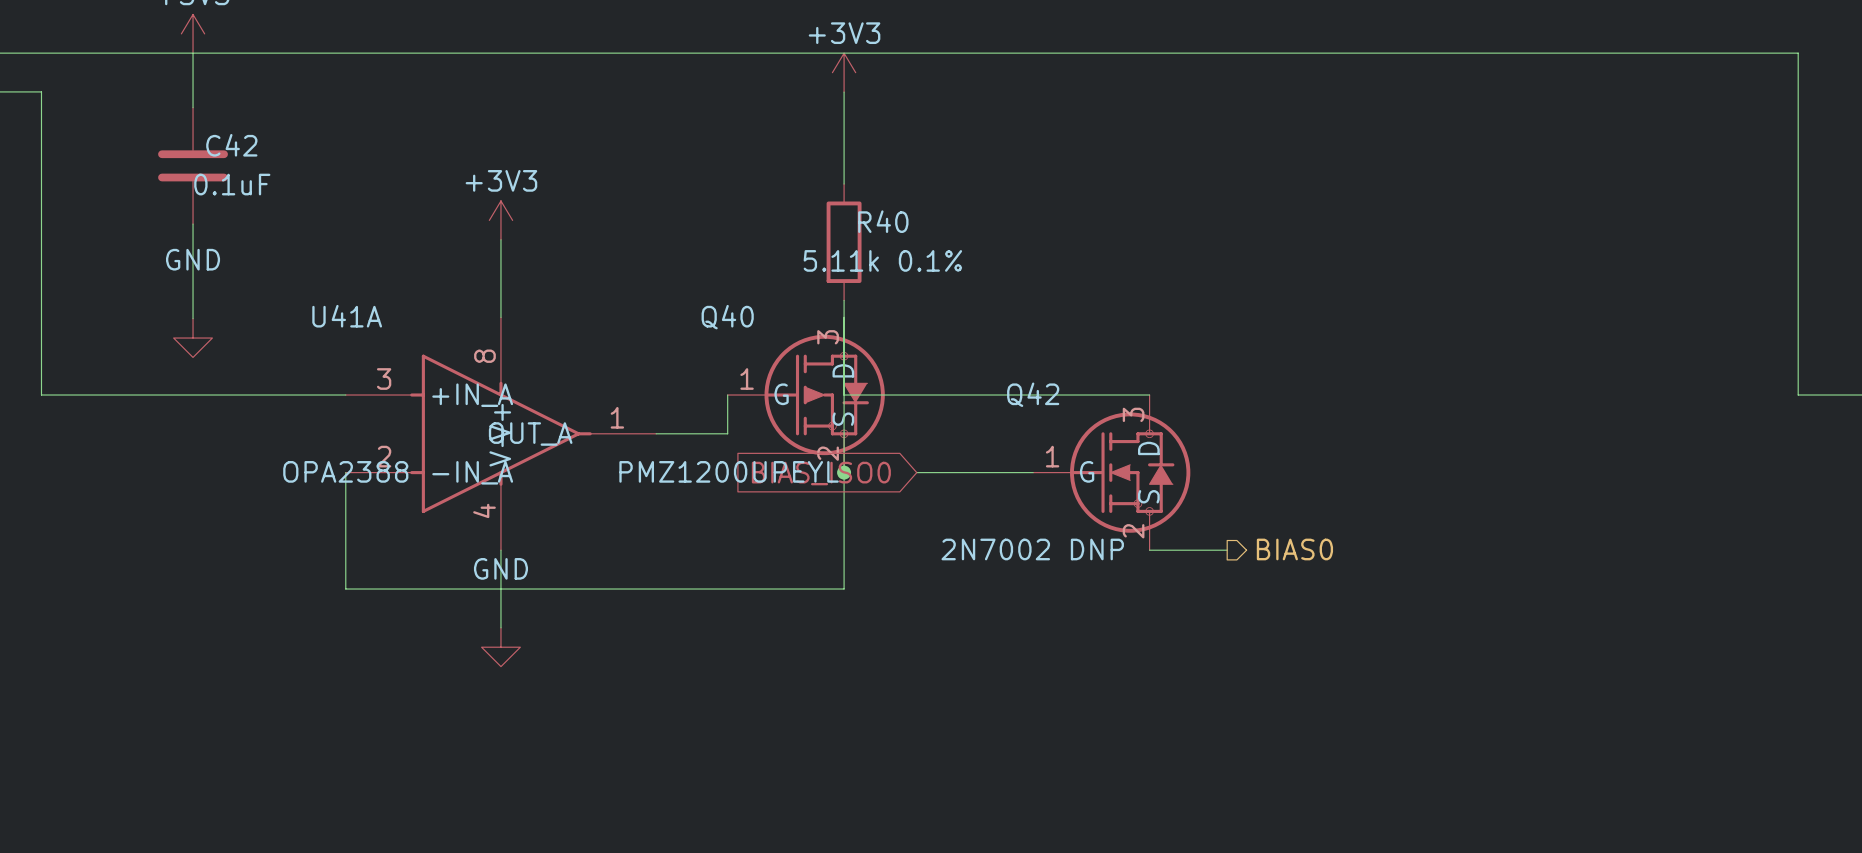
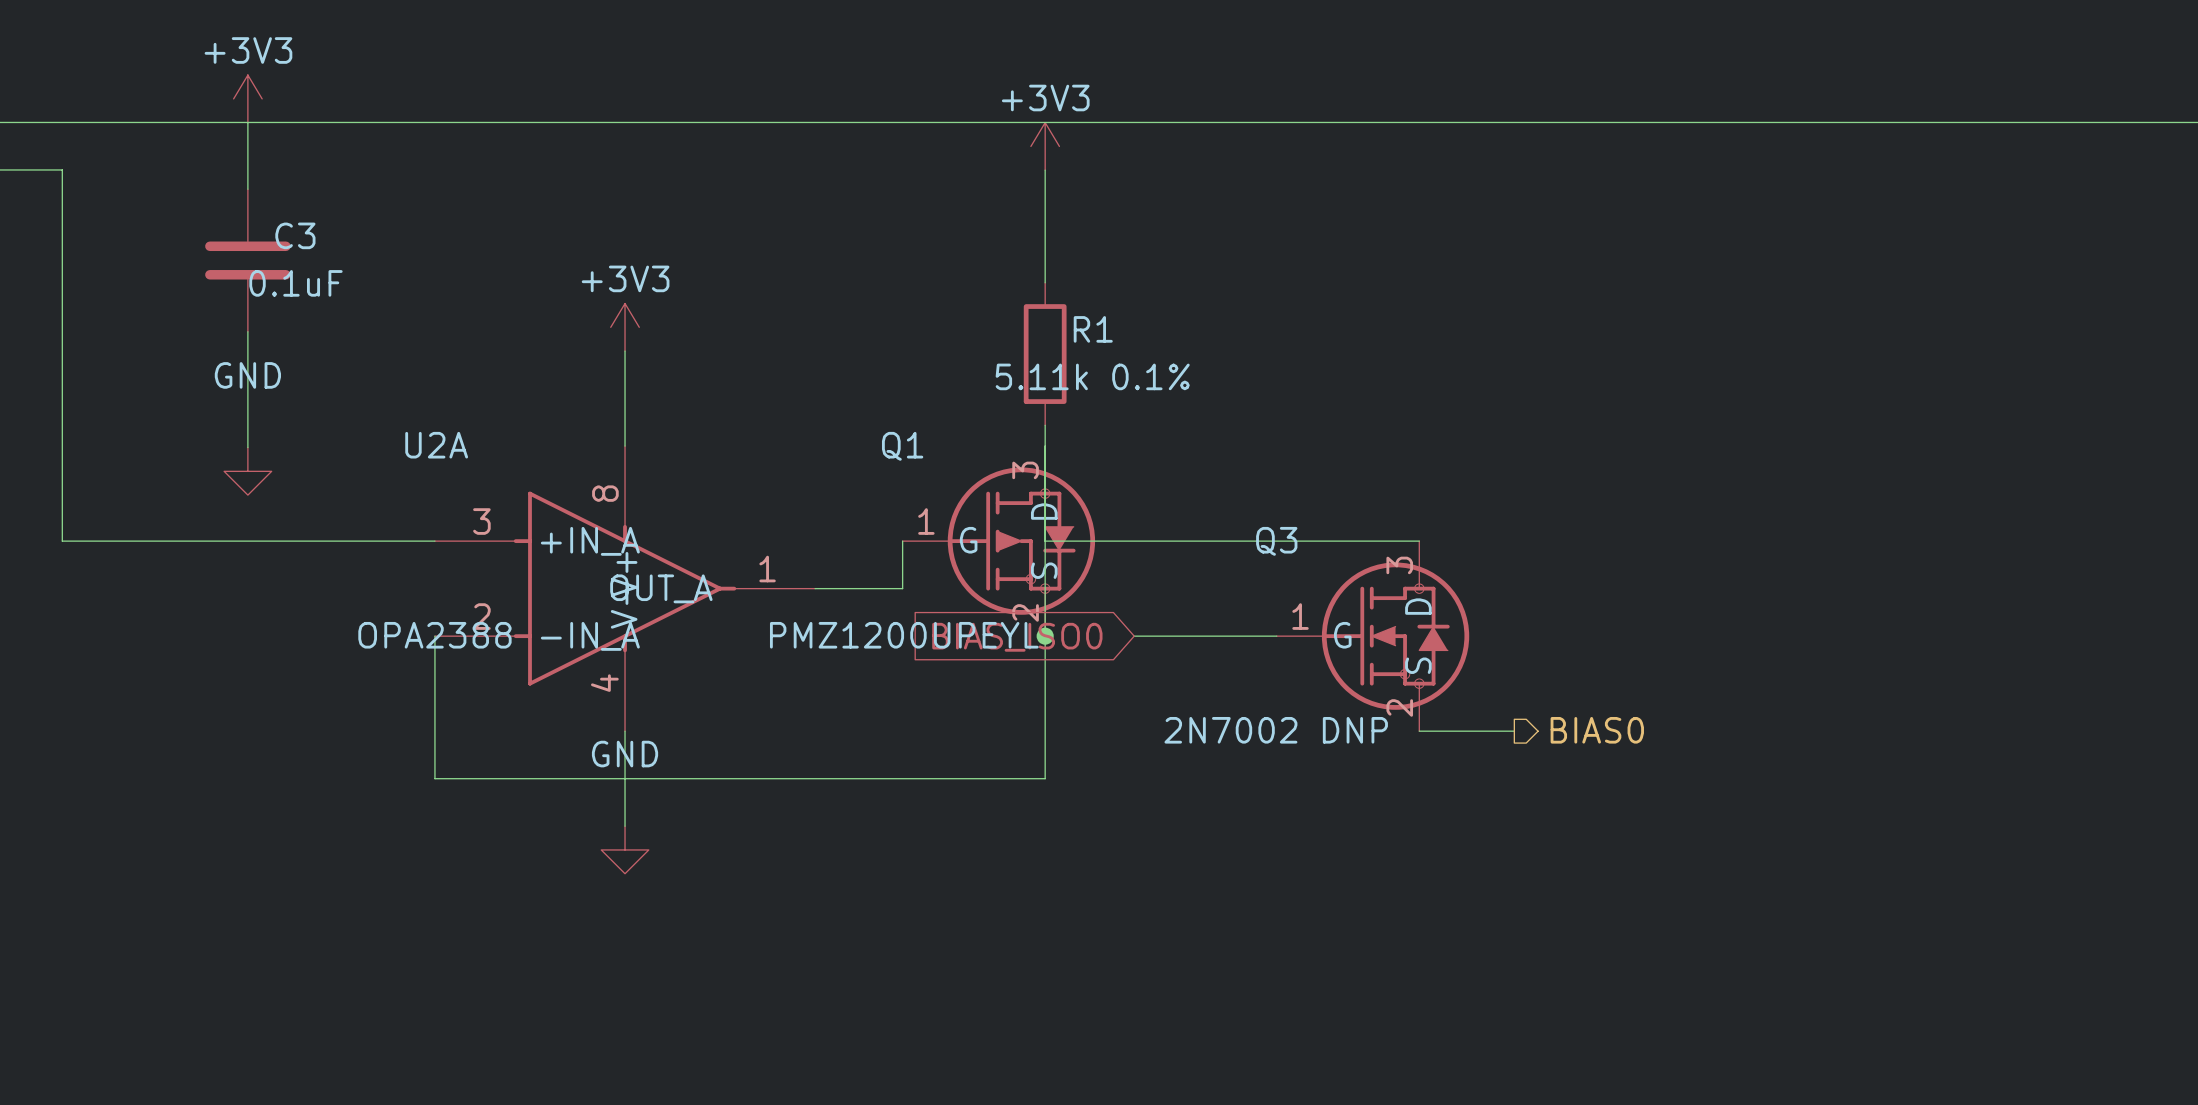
C42 name: C42 (231, 145) -> C3 (295, 235)
R40 name: R40 (883, 221) -> R1 (1093, 329)
U41A name: U41A (347, 316) -> U2A (436, 445)
Q40 name: Q40 (727, 317) -> Q1 (902, 446)
Q42 name: Q42 (1033, 394) -> Q3 (1276, 541)

